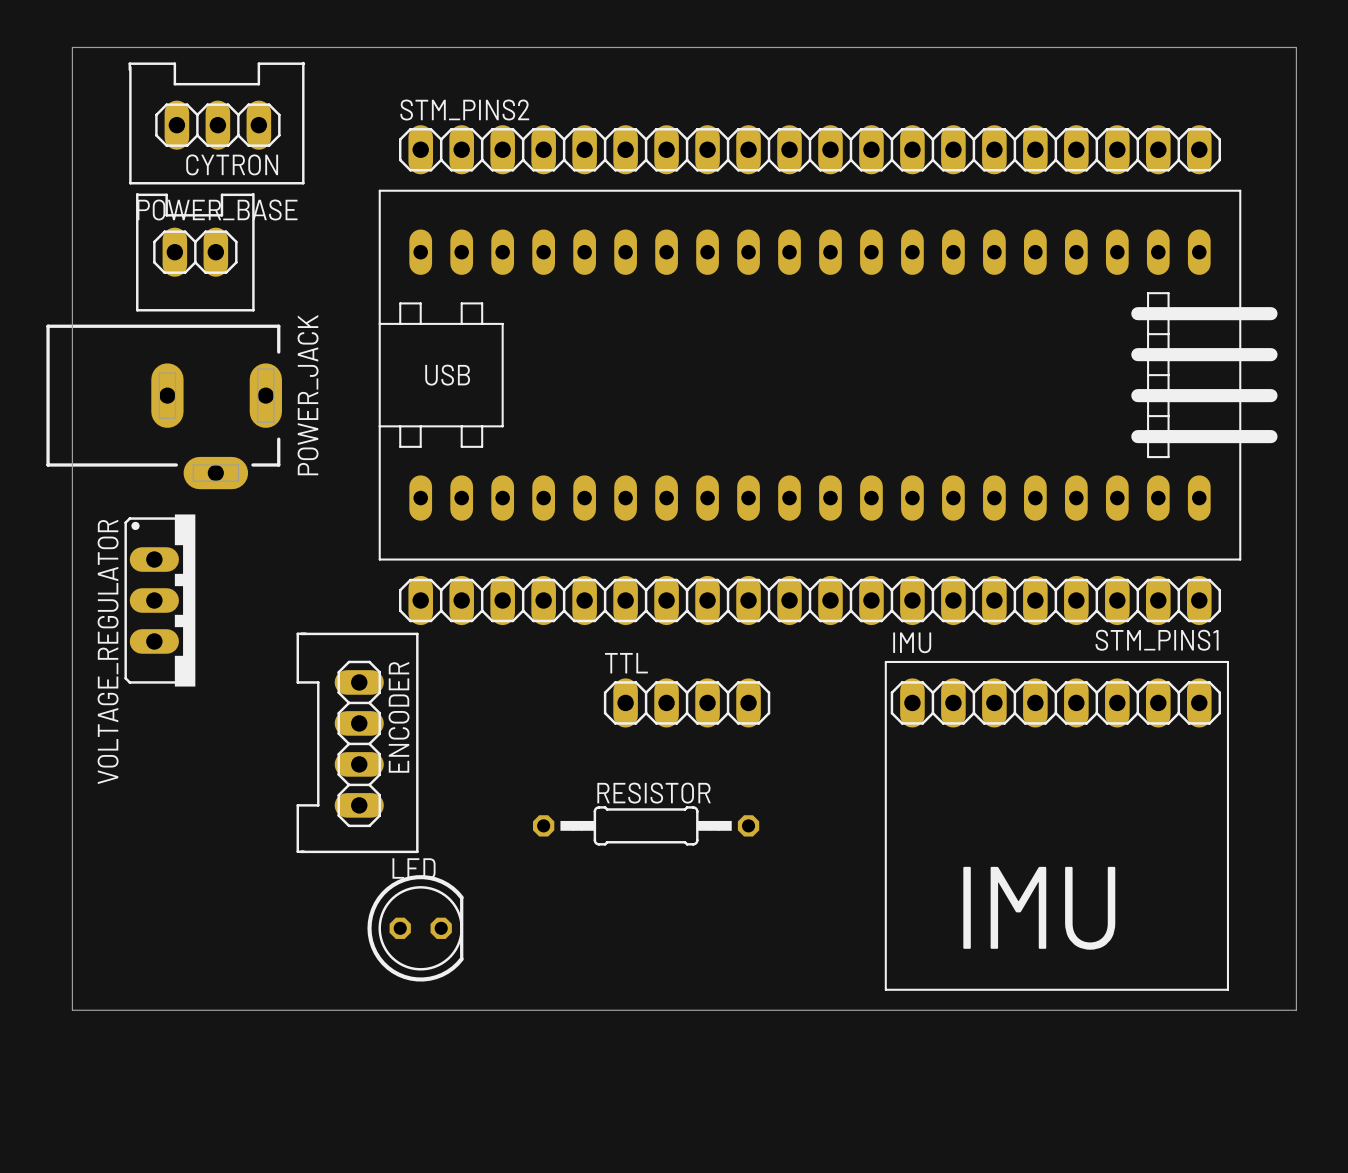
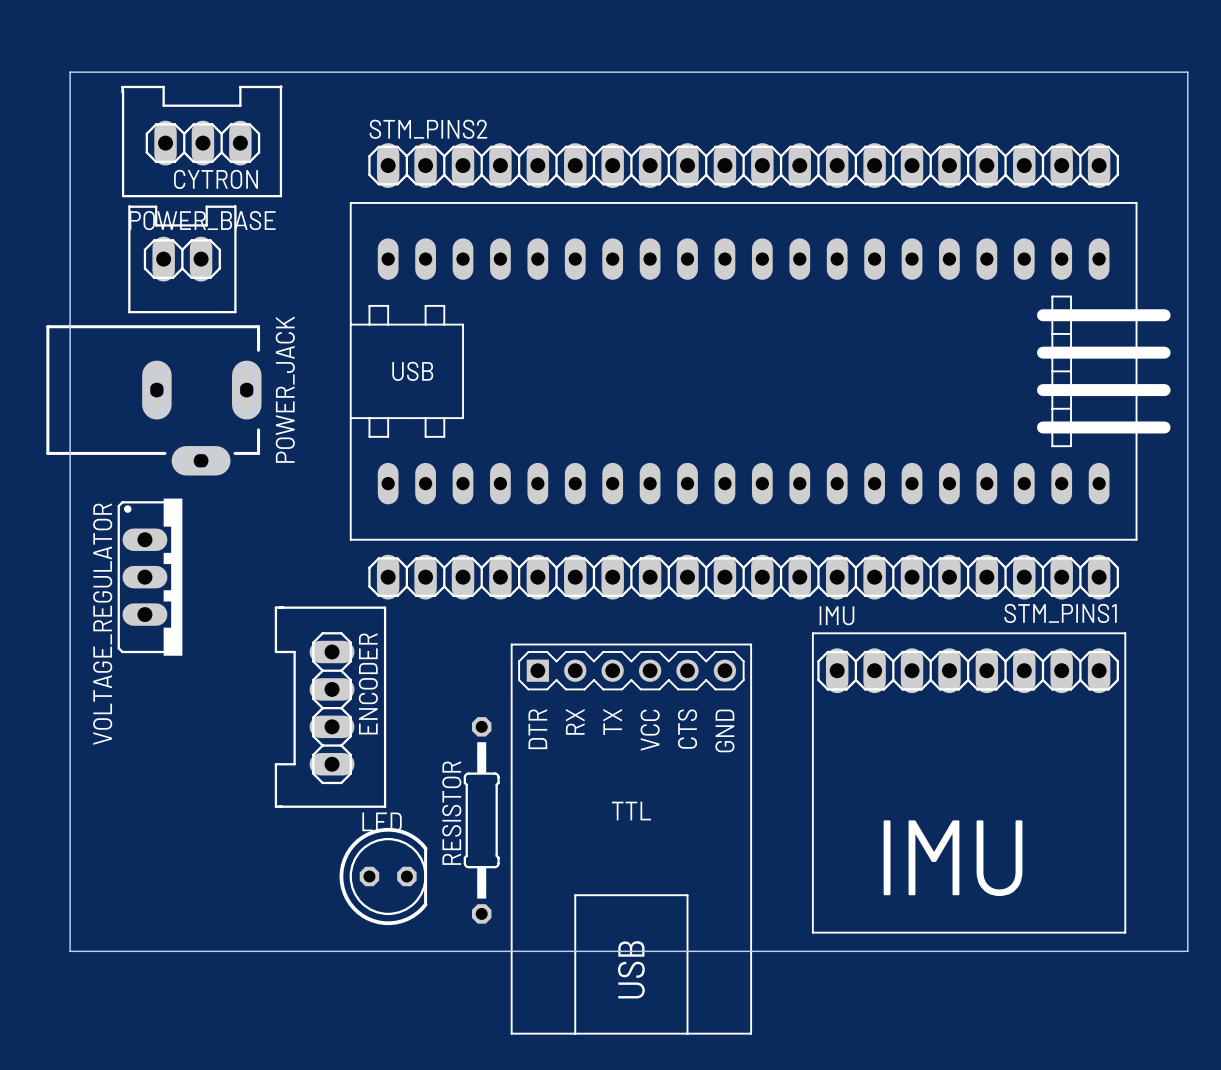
TTL: (687, 702) -> none
RESISTOR name position: RESISTOR (654, 793) -> RESISTOR (451, 813)
RESISTOR rotation: 0° (646, 825) -> 90° clockwise (481, 820)
TTL: none -> (631, 839)

